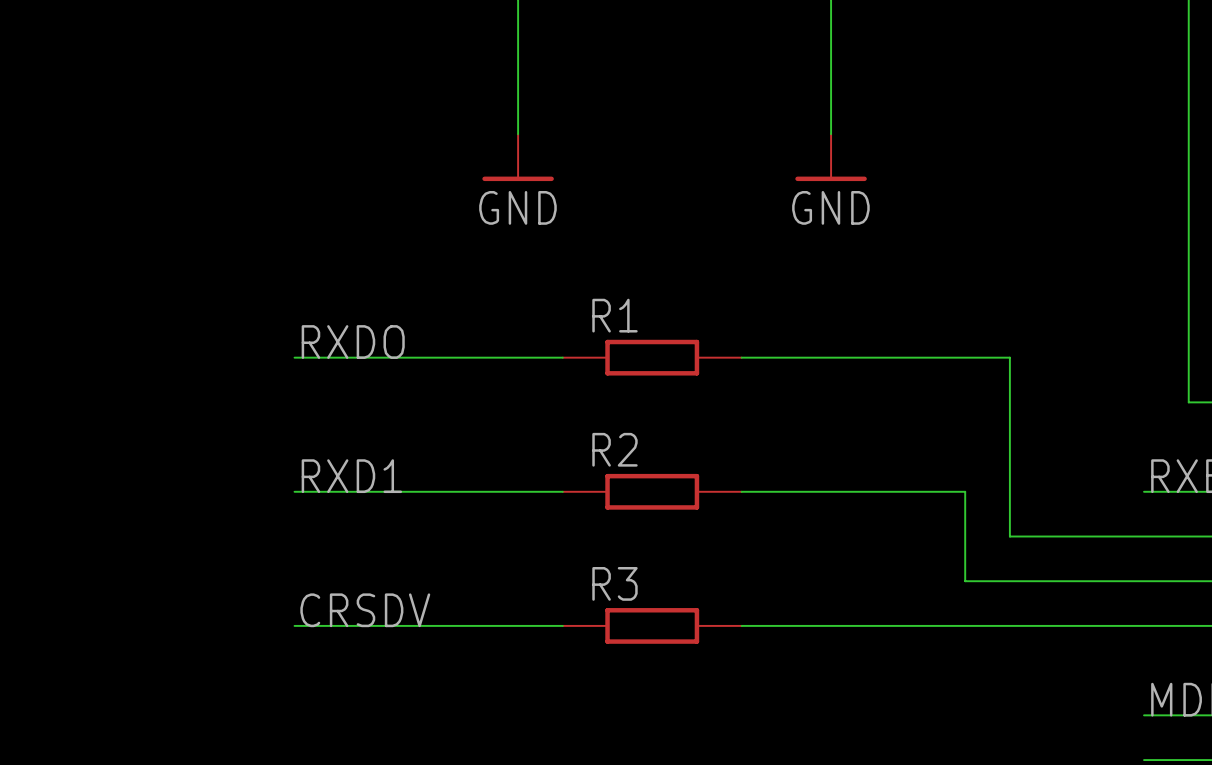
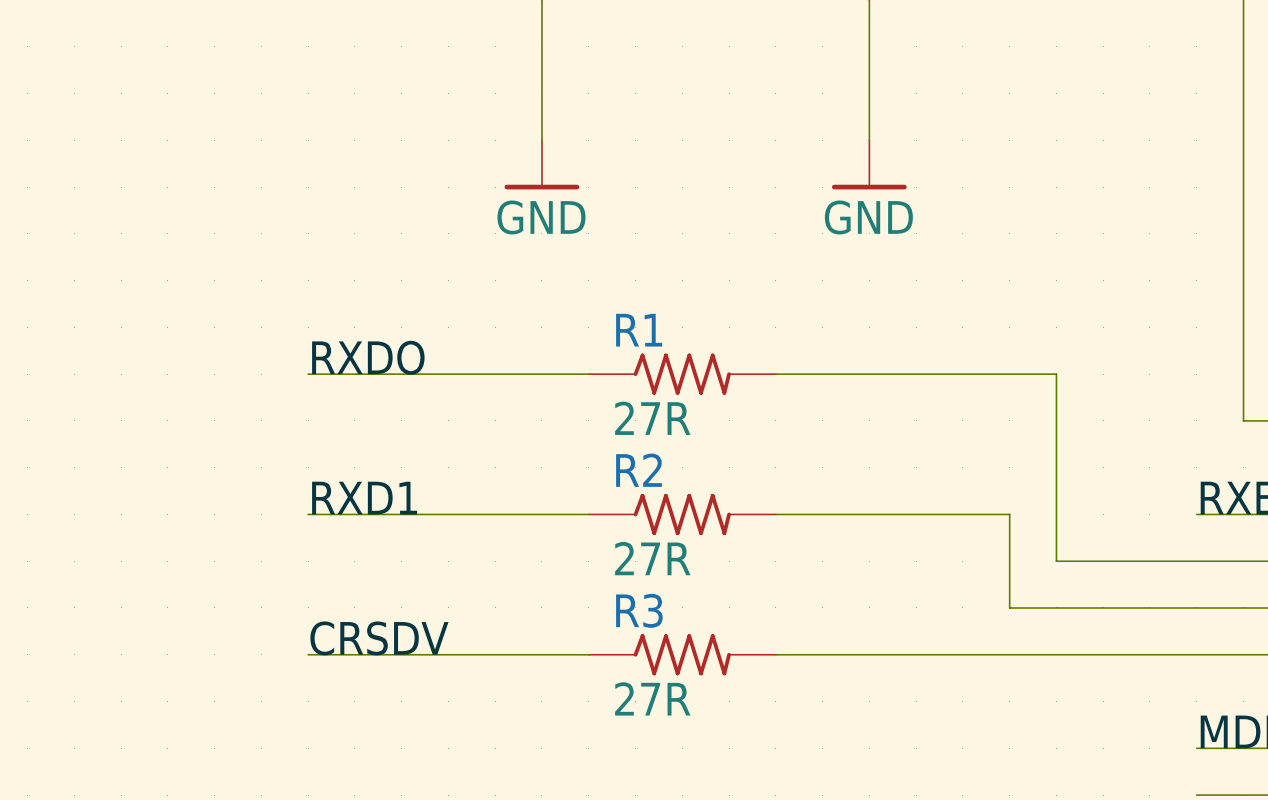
R1 symbol: [562, 339, 742, 376] -> [588, 353, 776, 395]
R1 value: none -> 27R (652, 418)
R2 symbol: [562, 473, 742, 510] -> [588, 493, 776, 536]
R2 value: none -> 27R (652, 558)
R3 symbol: [562, 608, 742, 644] -> [588, 634, 776, 676]
R3 value: none -> 27R (652, 698)

